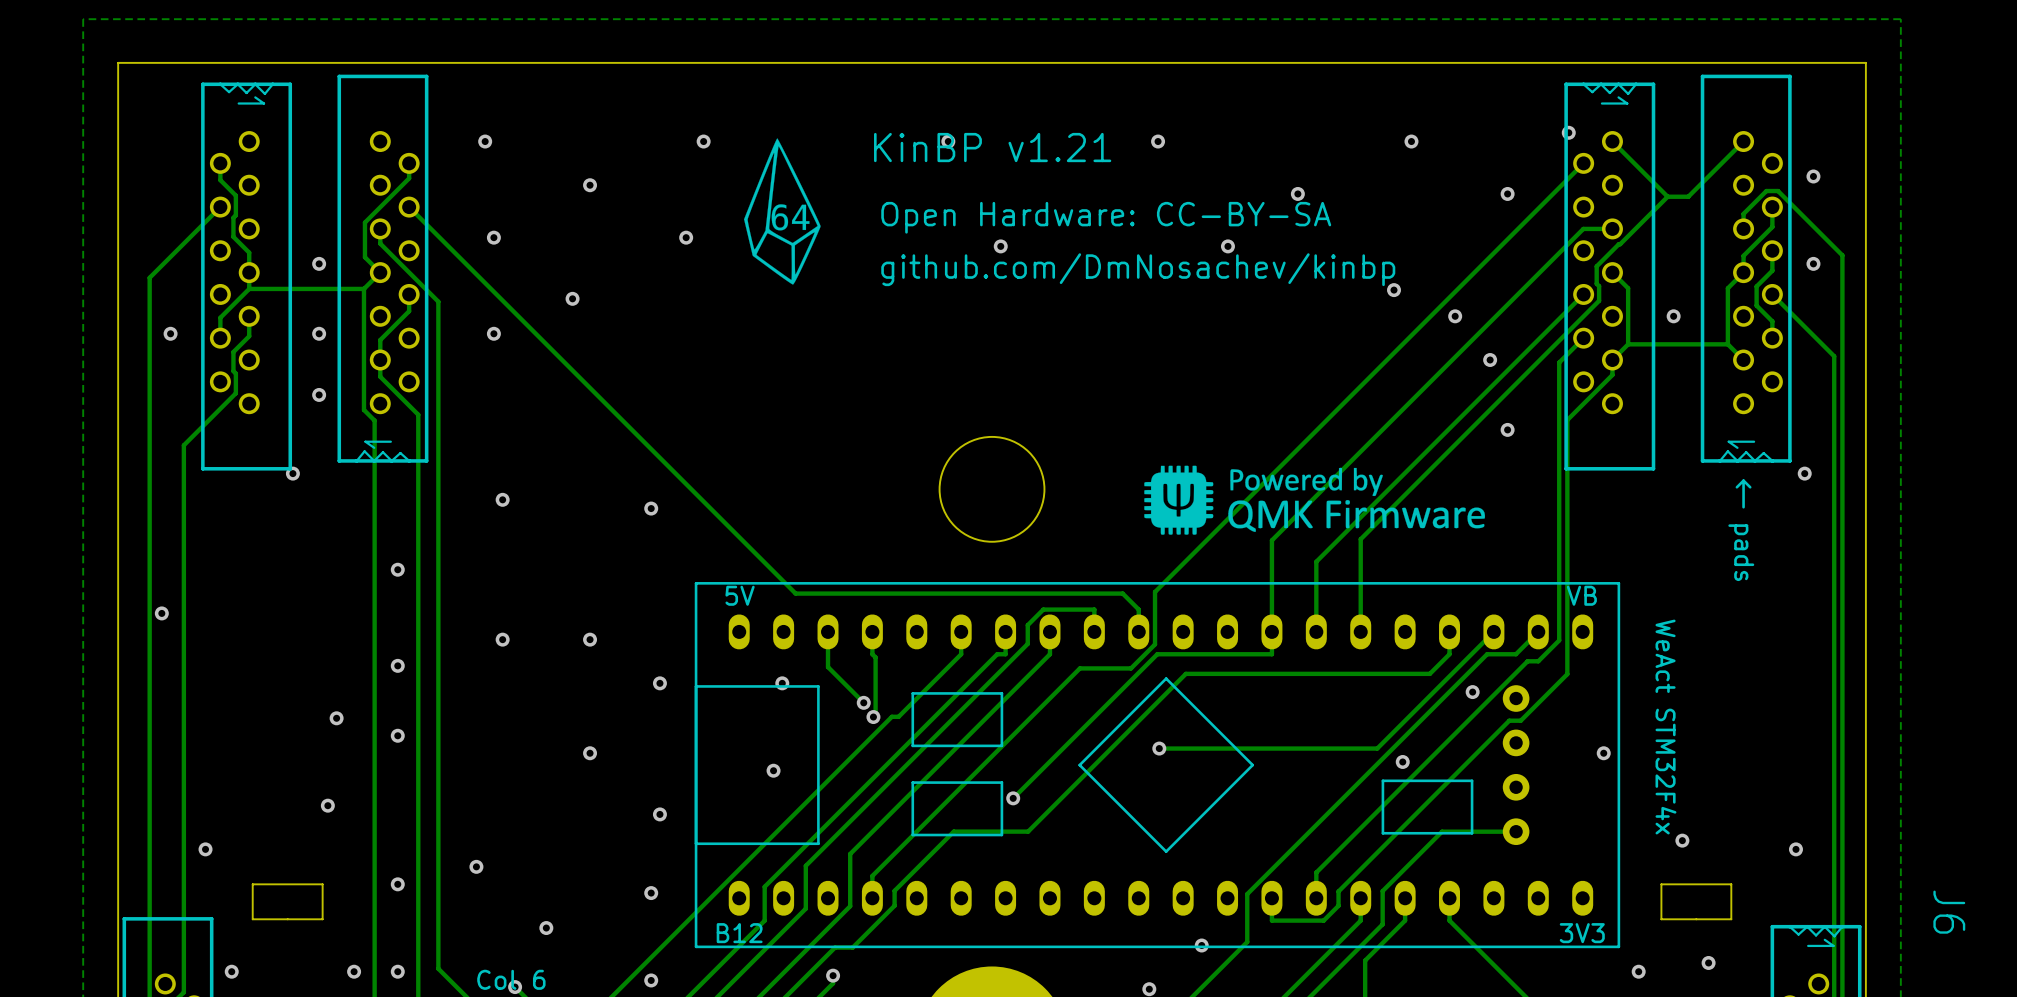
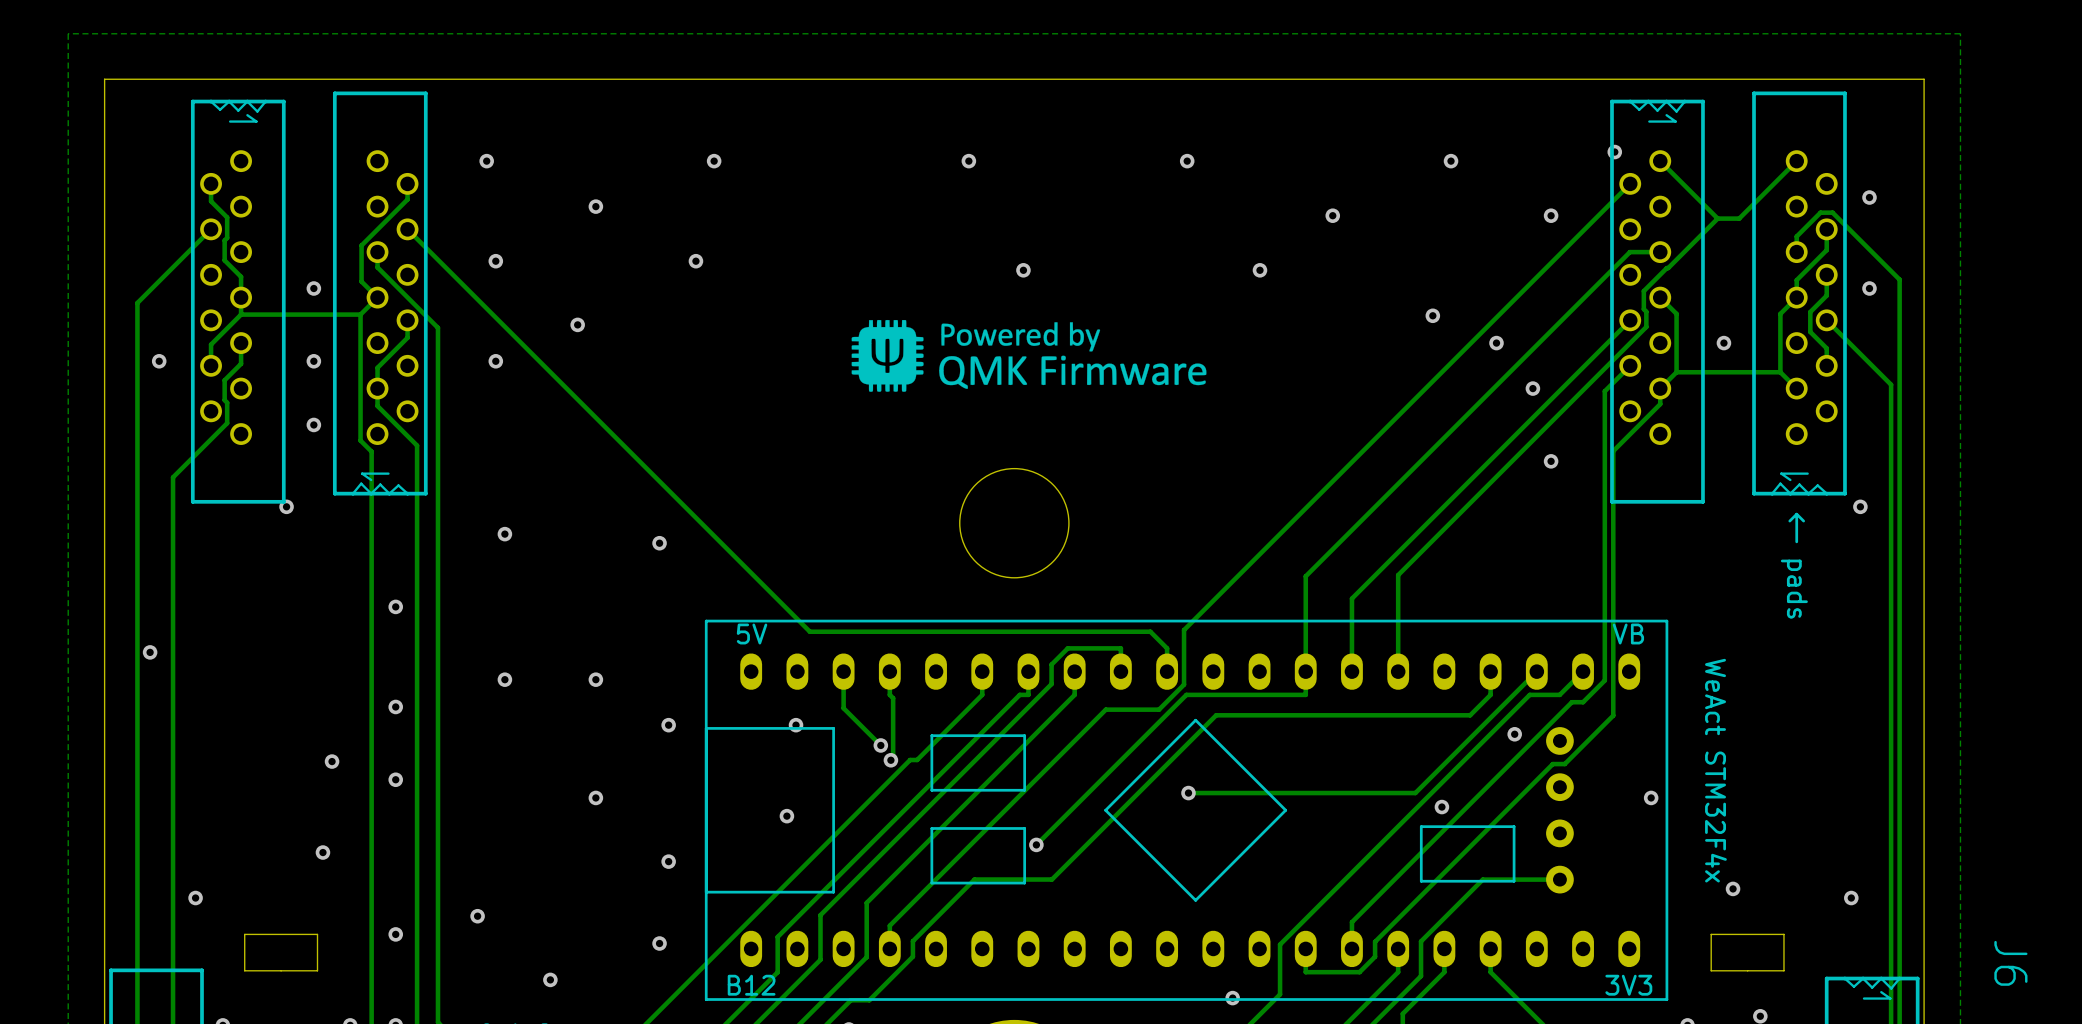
drawing: [744, 138, 821, 285] -> none
text: KinBP v1.21 (992, 147) -> none
text: Open Hardware: CC-BY-SA (1106, 217) -> none
text: github.com/DmNosachev/kinbp (1138, 269) -> none
drawing position: (1314, 500) -> (1029, 355)

